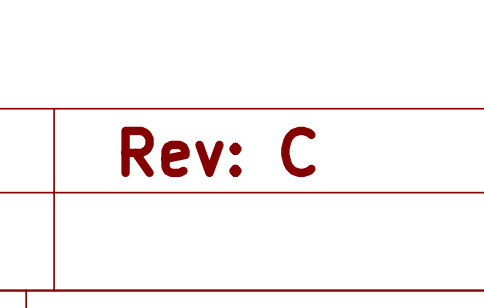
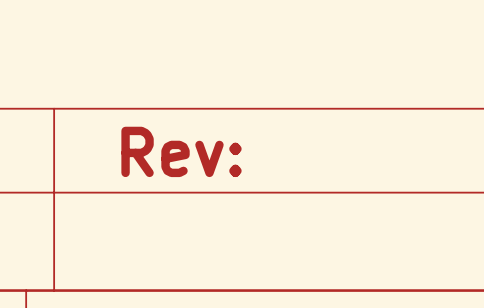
title block: Rev: C (218, 151) -> Rev: (181, 151)

